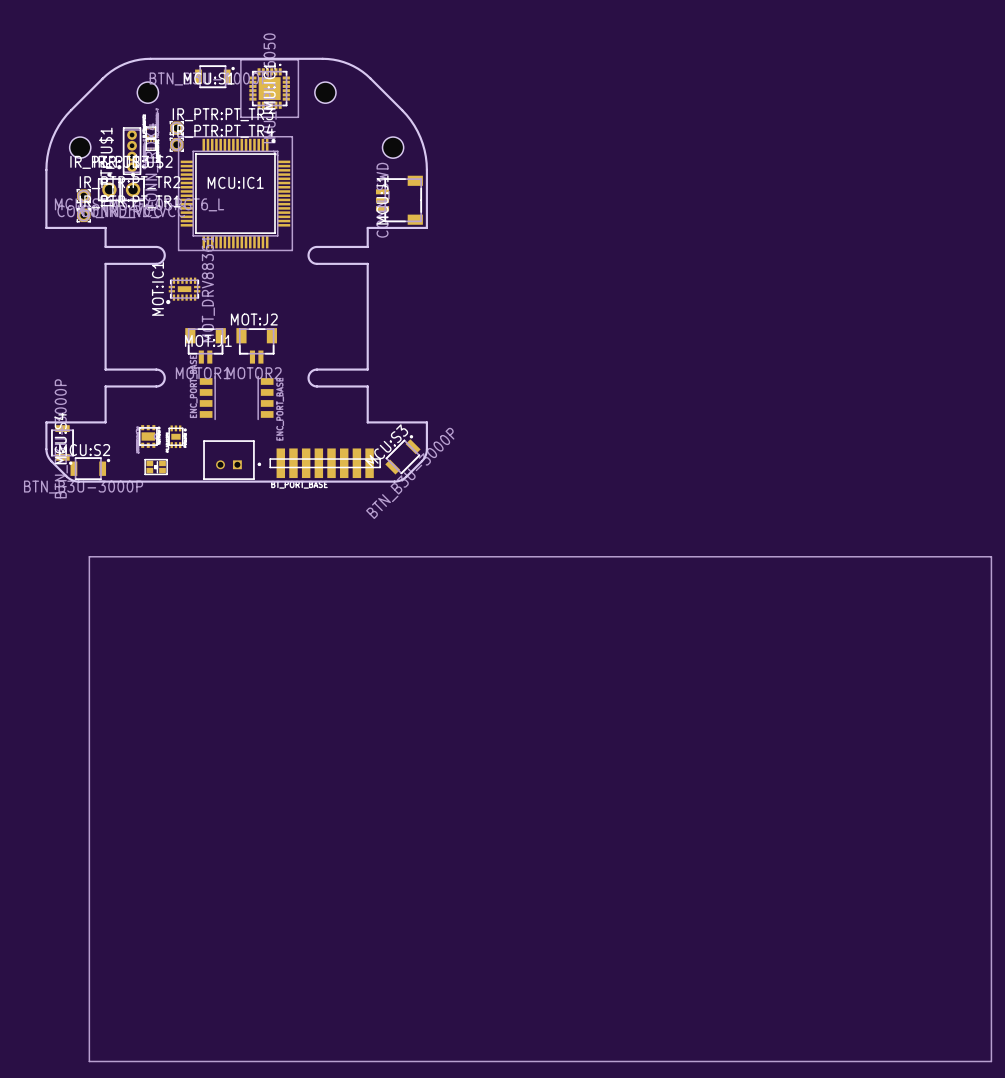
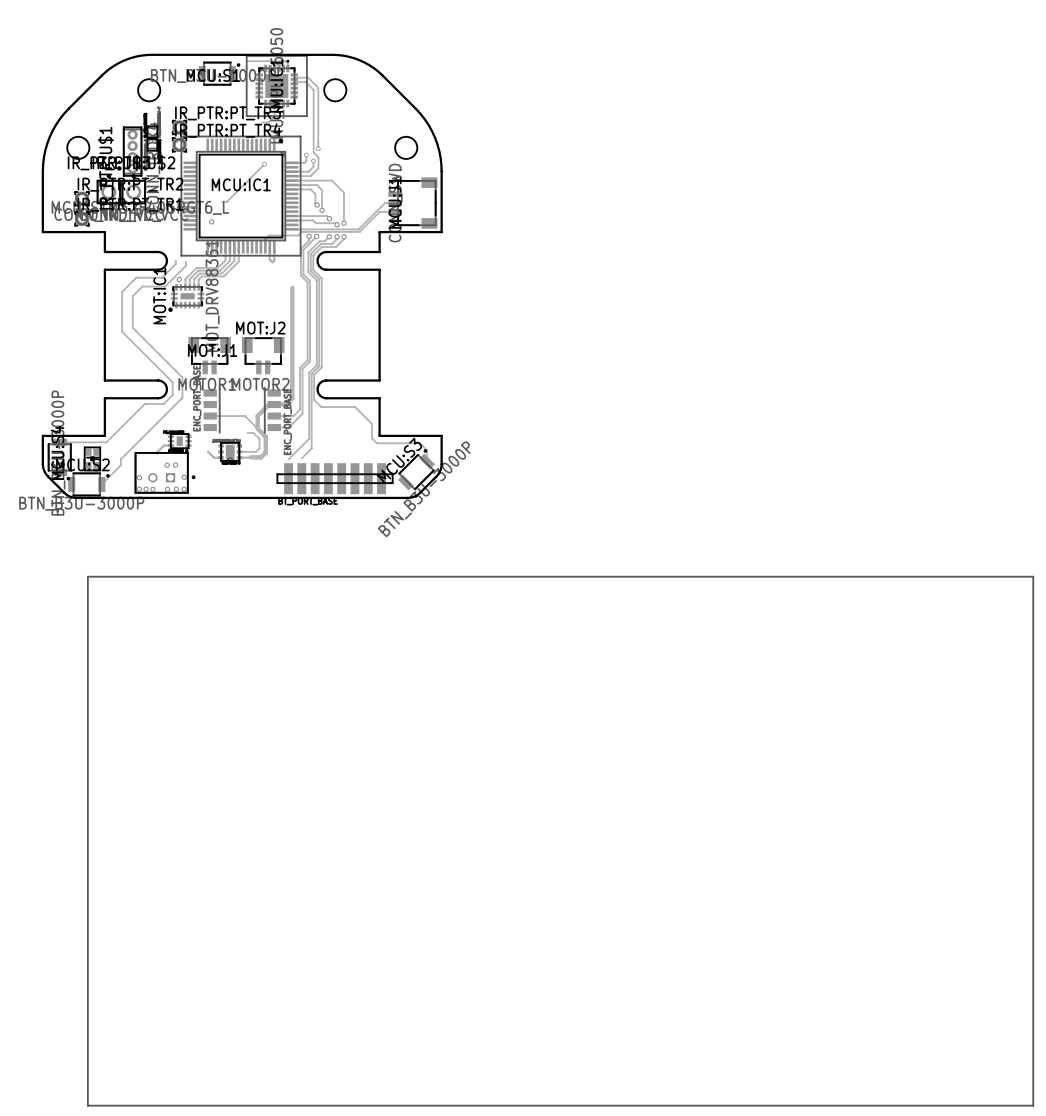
track: none -> (247, 61) (285, 61) (287, 63) (287, 71)
track: none -> (294, 77) (308, 77) (318, 87) (318, 148)
track: none -> (294, 82) (305, 82) (313, 89) (313, 152) (318, 157) (318, 168) (310, 176) (291, 176)
track: none -> (274, 106) (274, 116) (268, 122) (261, 122)
via: none -> (318, 148)
track: none -> (306, 155) (304, 162) (291, 162)
via: none -> (306, 155)
track: none -> (313, 160) (313, 166) (308, 171) (291, 171)
via: none -> (313, 160)
track: none -> (264, 164) (227, 201) (222, 201)
via: none -> (264, 164)
track: none -> (291, 180) (331, 180) (343, 192) (343, 223)
track: none -> (291, 185) (317, 185) (322, 189) (322, 210)
track: none -> (291, 189) (310, 189) (315, 193) (317, 205)
track: none -> (395, 203) (385, 203) (358, 229) (292, 229)
via: none -> (317, 205)
via: none -> (322, 210)
track: none -> (395, 211) (379, 211) (359, 231) (301, 231) (298, 235) (269, 235) (265, 239) (265, 247)
track: none -> (291, 216) (326, 216) (329, 218)
via: none -> (329, 218)
track: none -> (291, 220) (313, 220) (315, 223) (337, 224)
via: none -> (211, 221)
via: none -> (343, 223)
via: none -> (337, 224)
track: none -> (309, 236) (309, 240) (300, 248) (300, 275) (307, 282) (307, 360) (300, 367) (300, 409) (293, 416) (274, 416)
via: none -> (309, 236)
track: none -> (316, 236) (303, 249) (303, 274) (310, 281) (310, 361) (302, 368) (302, 413) (288, 427) (274, 427)
via: none -> (316, 236)
track: none -> (329, 236) (324, 241) (319, 241) (308, 252) (308, 272) (316, 280) (316, 365) (309, 372) (309, 438) (288, 459)
via: none -> (329, 236)
track: none -> (337, 236) (332, 243) (320, 243) (310, 254) (310, 271) (319, 279) (319, 366) (311, 373) (311, 448) (301, 458)
via: none -> (337, 236)
track: none -> (344, 236) (336, 246) (321, 246) (313, 255) (313, 270) (321, 278) (321, 367) (314, 374) (314, 399) (321, 407) (355, 407) (371, 423) (371, 438) (376, 443) (419, 443) (427, 450) (427, 461)
via: none -> (344, 236)
track: none -> (225, 247) (225, 260) (217, 267) (196, 267) (185, 279) (185, 287)
track: none -> (229, 247) (229, 260) (220, 270) (198, 270) (189, 279) (189, 287)
track: none -> (234, 247) (234, 261) (221, 273) (199, 273) (194, 279) (194, 287)
track: none -> (238, 247) (238, 261) (223, 276) (201, 276) (198, 279) (198, 287)
track: none -> (269, 247) (269, 259) (272, 262) (274, 260) (274, 247)
track: none -> (175, 260) (175, 263) (162, 277) (136, 277) (122, 291) (122, 331) (172, 382) (172, 395) (163, 403) (144, 403) (106, 442) (59, 442)
track: none -> (185, 261) (185, 265) (165, 286) (142, 286) (132, 296) (132, 327) (182, 377) (182, 397) (120, 459) (120, 465) (102, 483)
via: none -> (179, 279)
track: none -> (292, 287) (292, 398) (286, 404) (269, 404)
track: none -> (269, 404) (257, 415) (257, 428)
track: none -> (210, 416) (245, 416) (257, 428)
track: none -> (257, 428) (265, 436) (265, 452) (261, 457) (239, 457)
track: none -> (247, 432) (253, 432) (259, 439) (259, 448) (255, 451) (239, 451)
track: none -> (170, 445) (163, 445) (156, 453)
part rotation: 0° (149, 436) -> 90° clockwise (230, 453)
part position: (149, 436) -> (230, 453)
part rotation: 0° (177, 436) -> 90° clockwise (179, 442)
track: none -> (207, 451) (213, 457) (221, 457)
via: none -> (167, 465)
via: none -> (175, 465)
part position: (232, 460) -> (165, 472)
via: none -> (184, 477)
via: none -> (139, 477)
part rotation: 0° (156, 467) -> 90° counterclockwise (92, 458)
part position: (156, 467) -> (92, 458)
via: none -> (139, 489)
via: none -> (146, 489)
via: none -> (152, 489)
via: none -> (167, 489)
via: none -> (176, 489)
via: none -> (184, 489)

